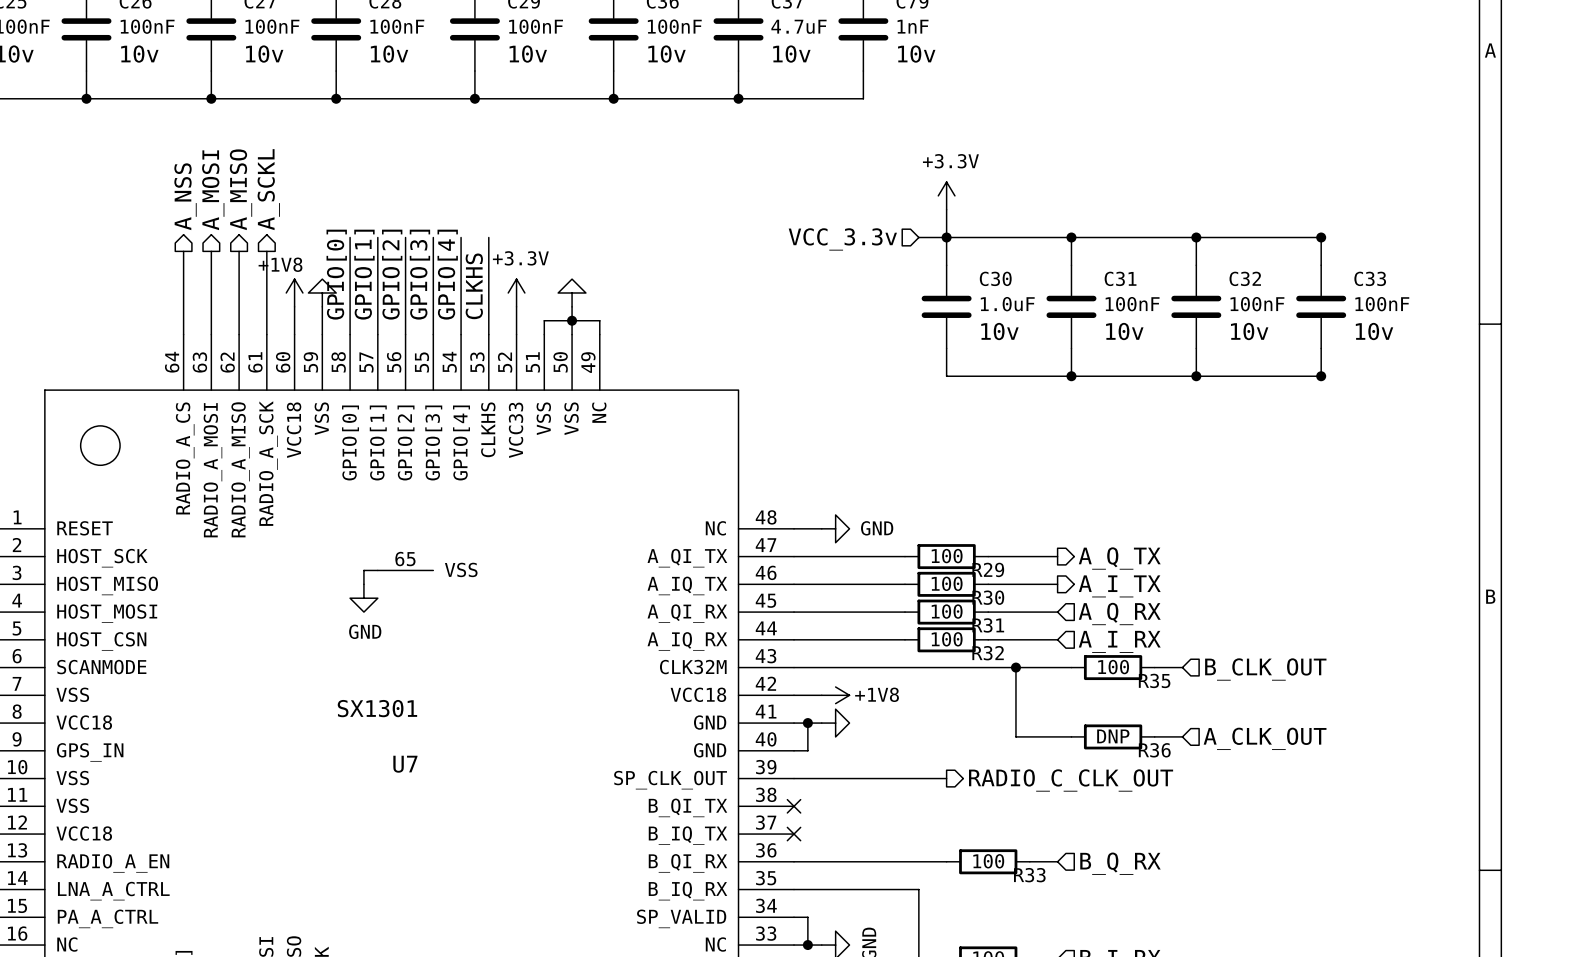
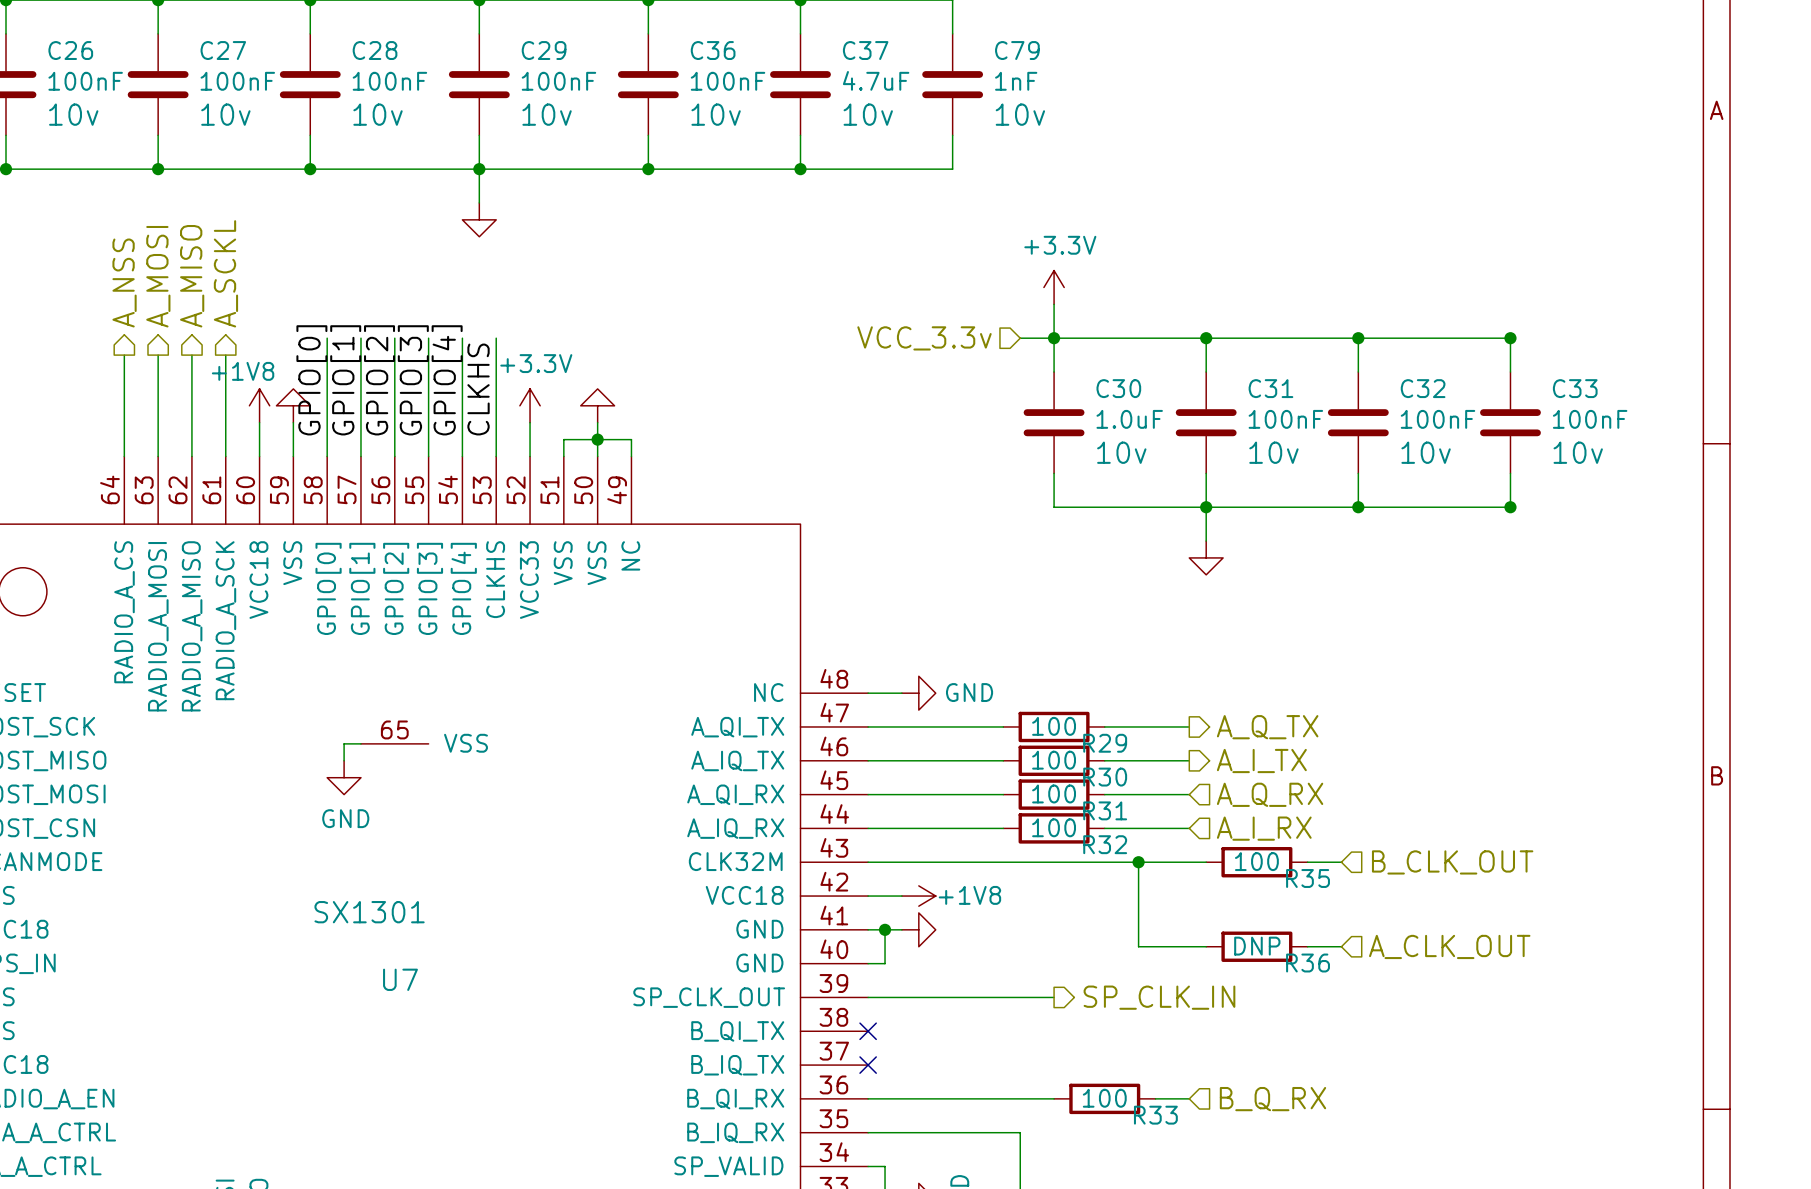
wire: none -> (479, 169) (479, 202)
power symbol: none -> (479, 219)
wire: none -> (1206, 507) (1206, 541)
power symbol: none -> (1206, 557)
hierarchical label: RADIO_C_CLK_OUT (1071, 780) -> SP_CLK_IN (1159, 997)

